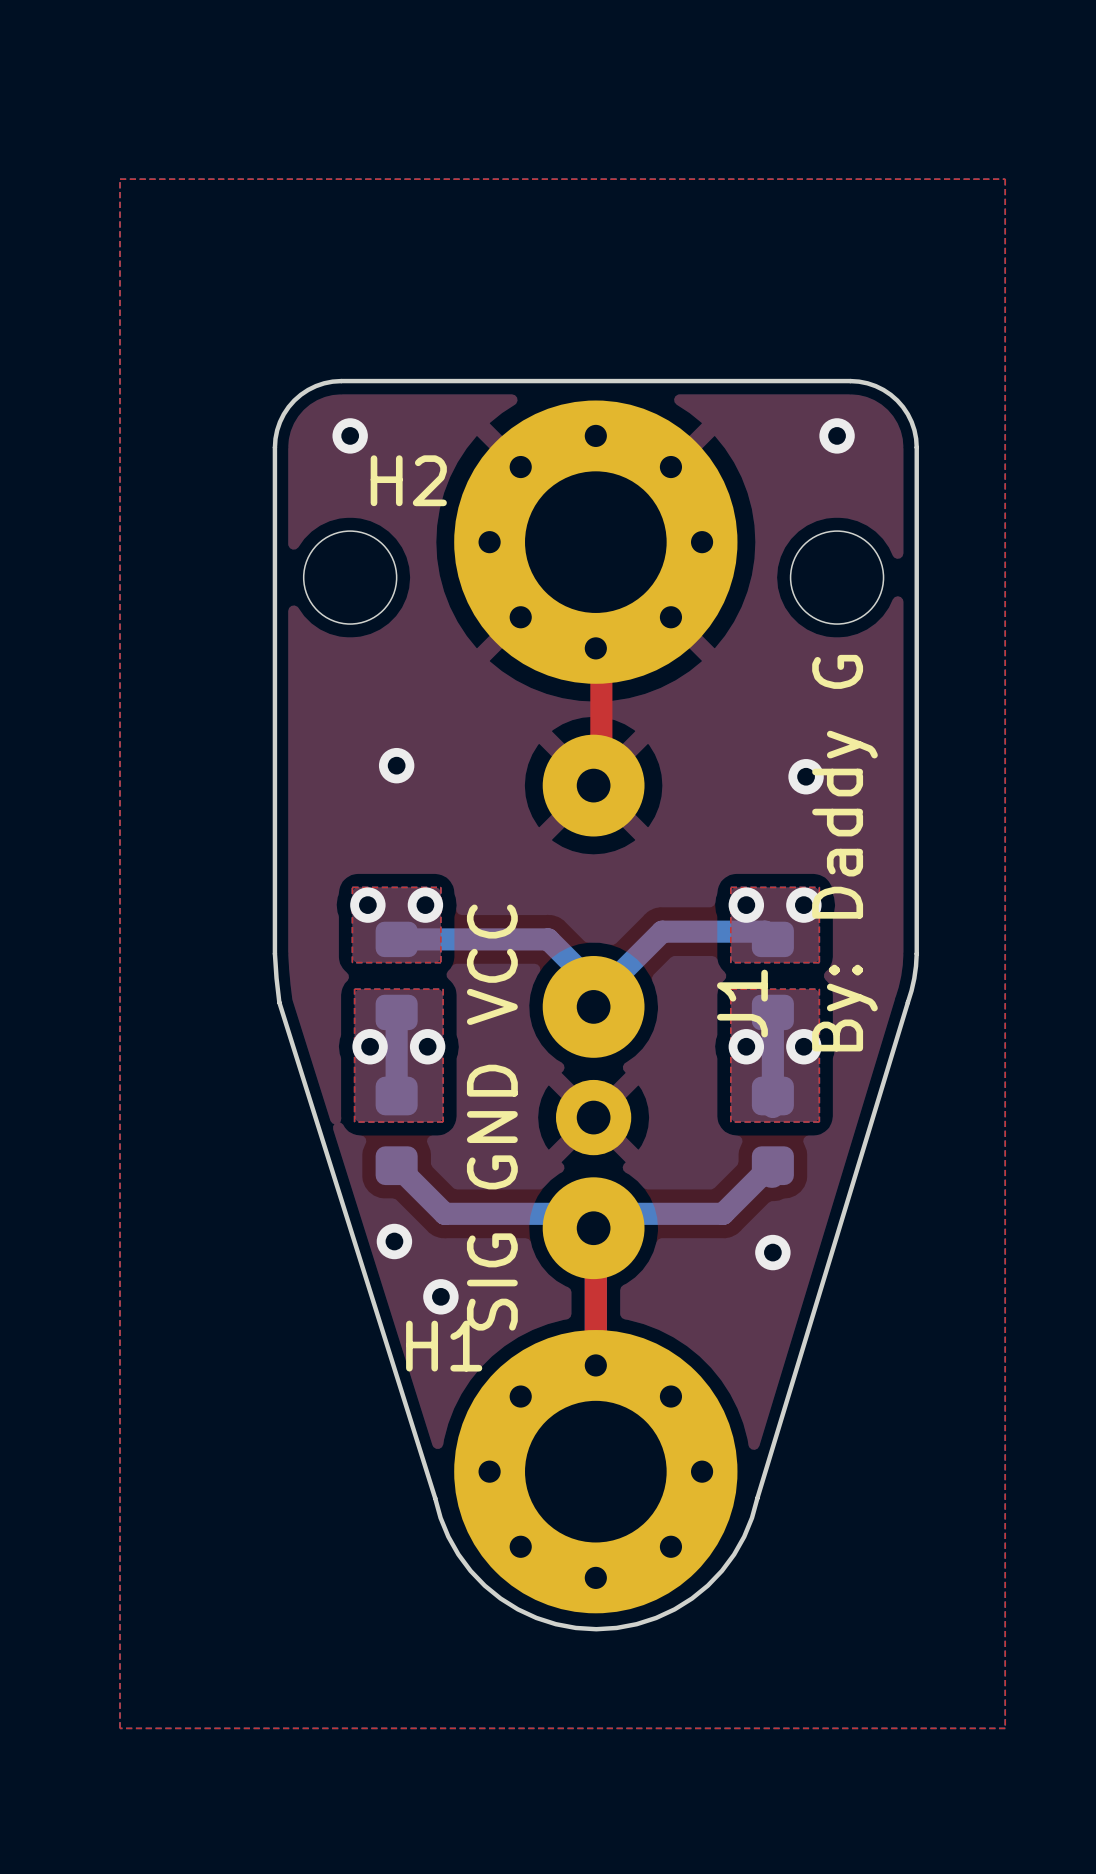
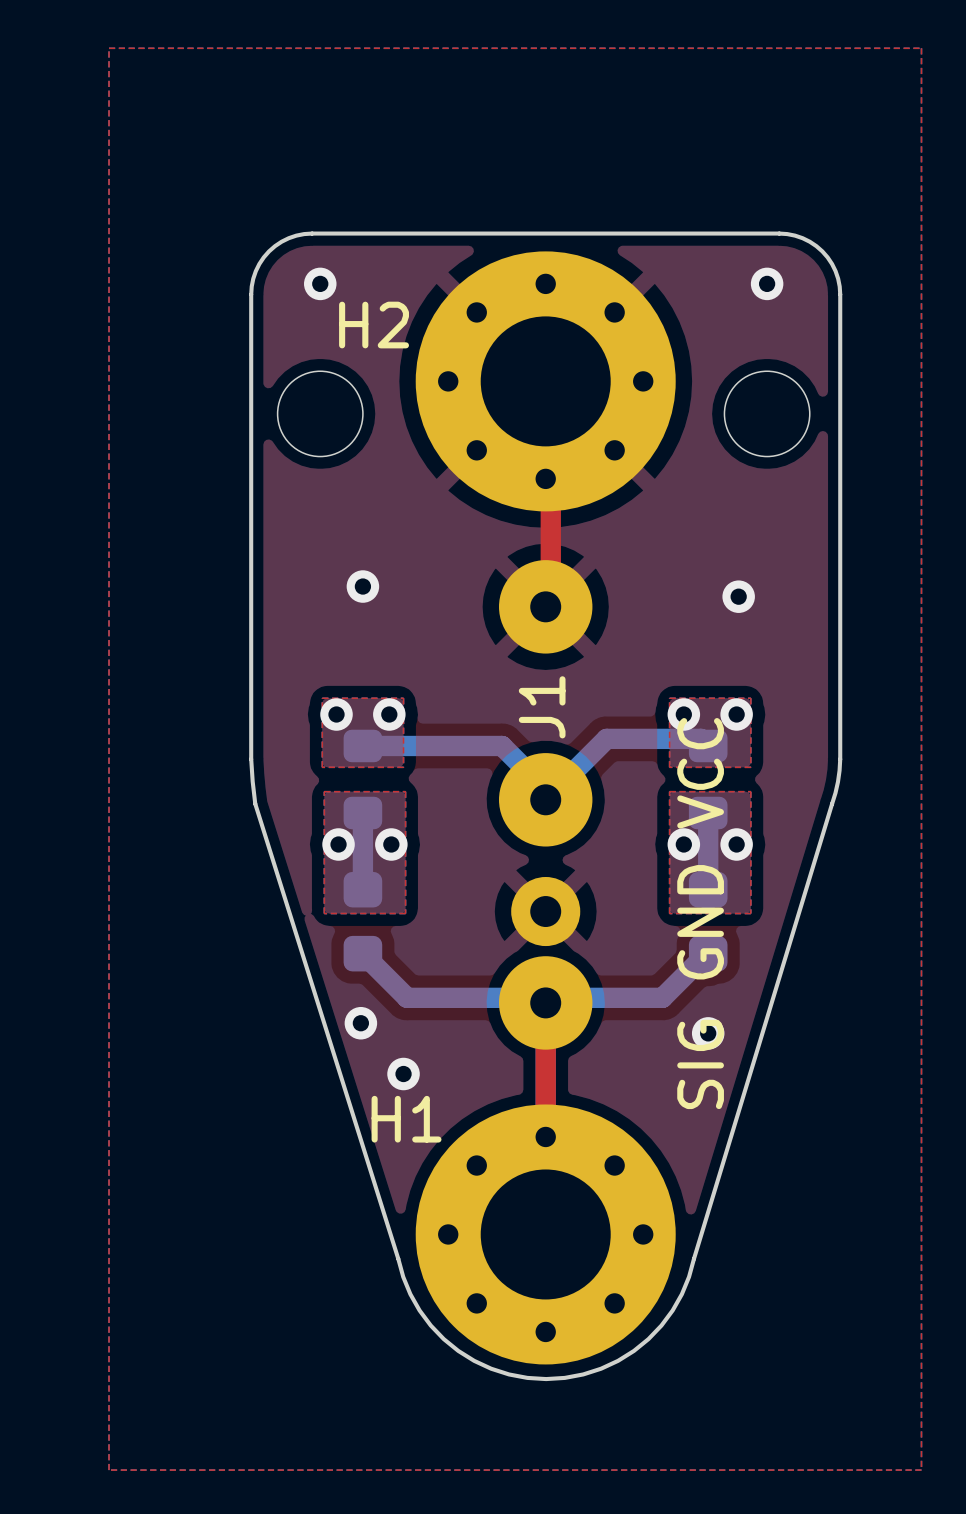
J1 footprint: [542, 734, 645, 1280] -> [499, 560, 593, 1050]
text: By: Daddy G (844, 853) -> none
J1 name position: J1 (742, 1003) -> J1 (542, 707)

